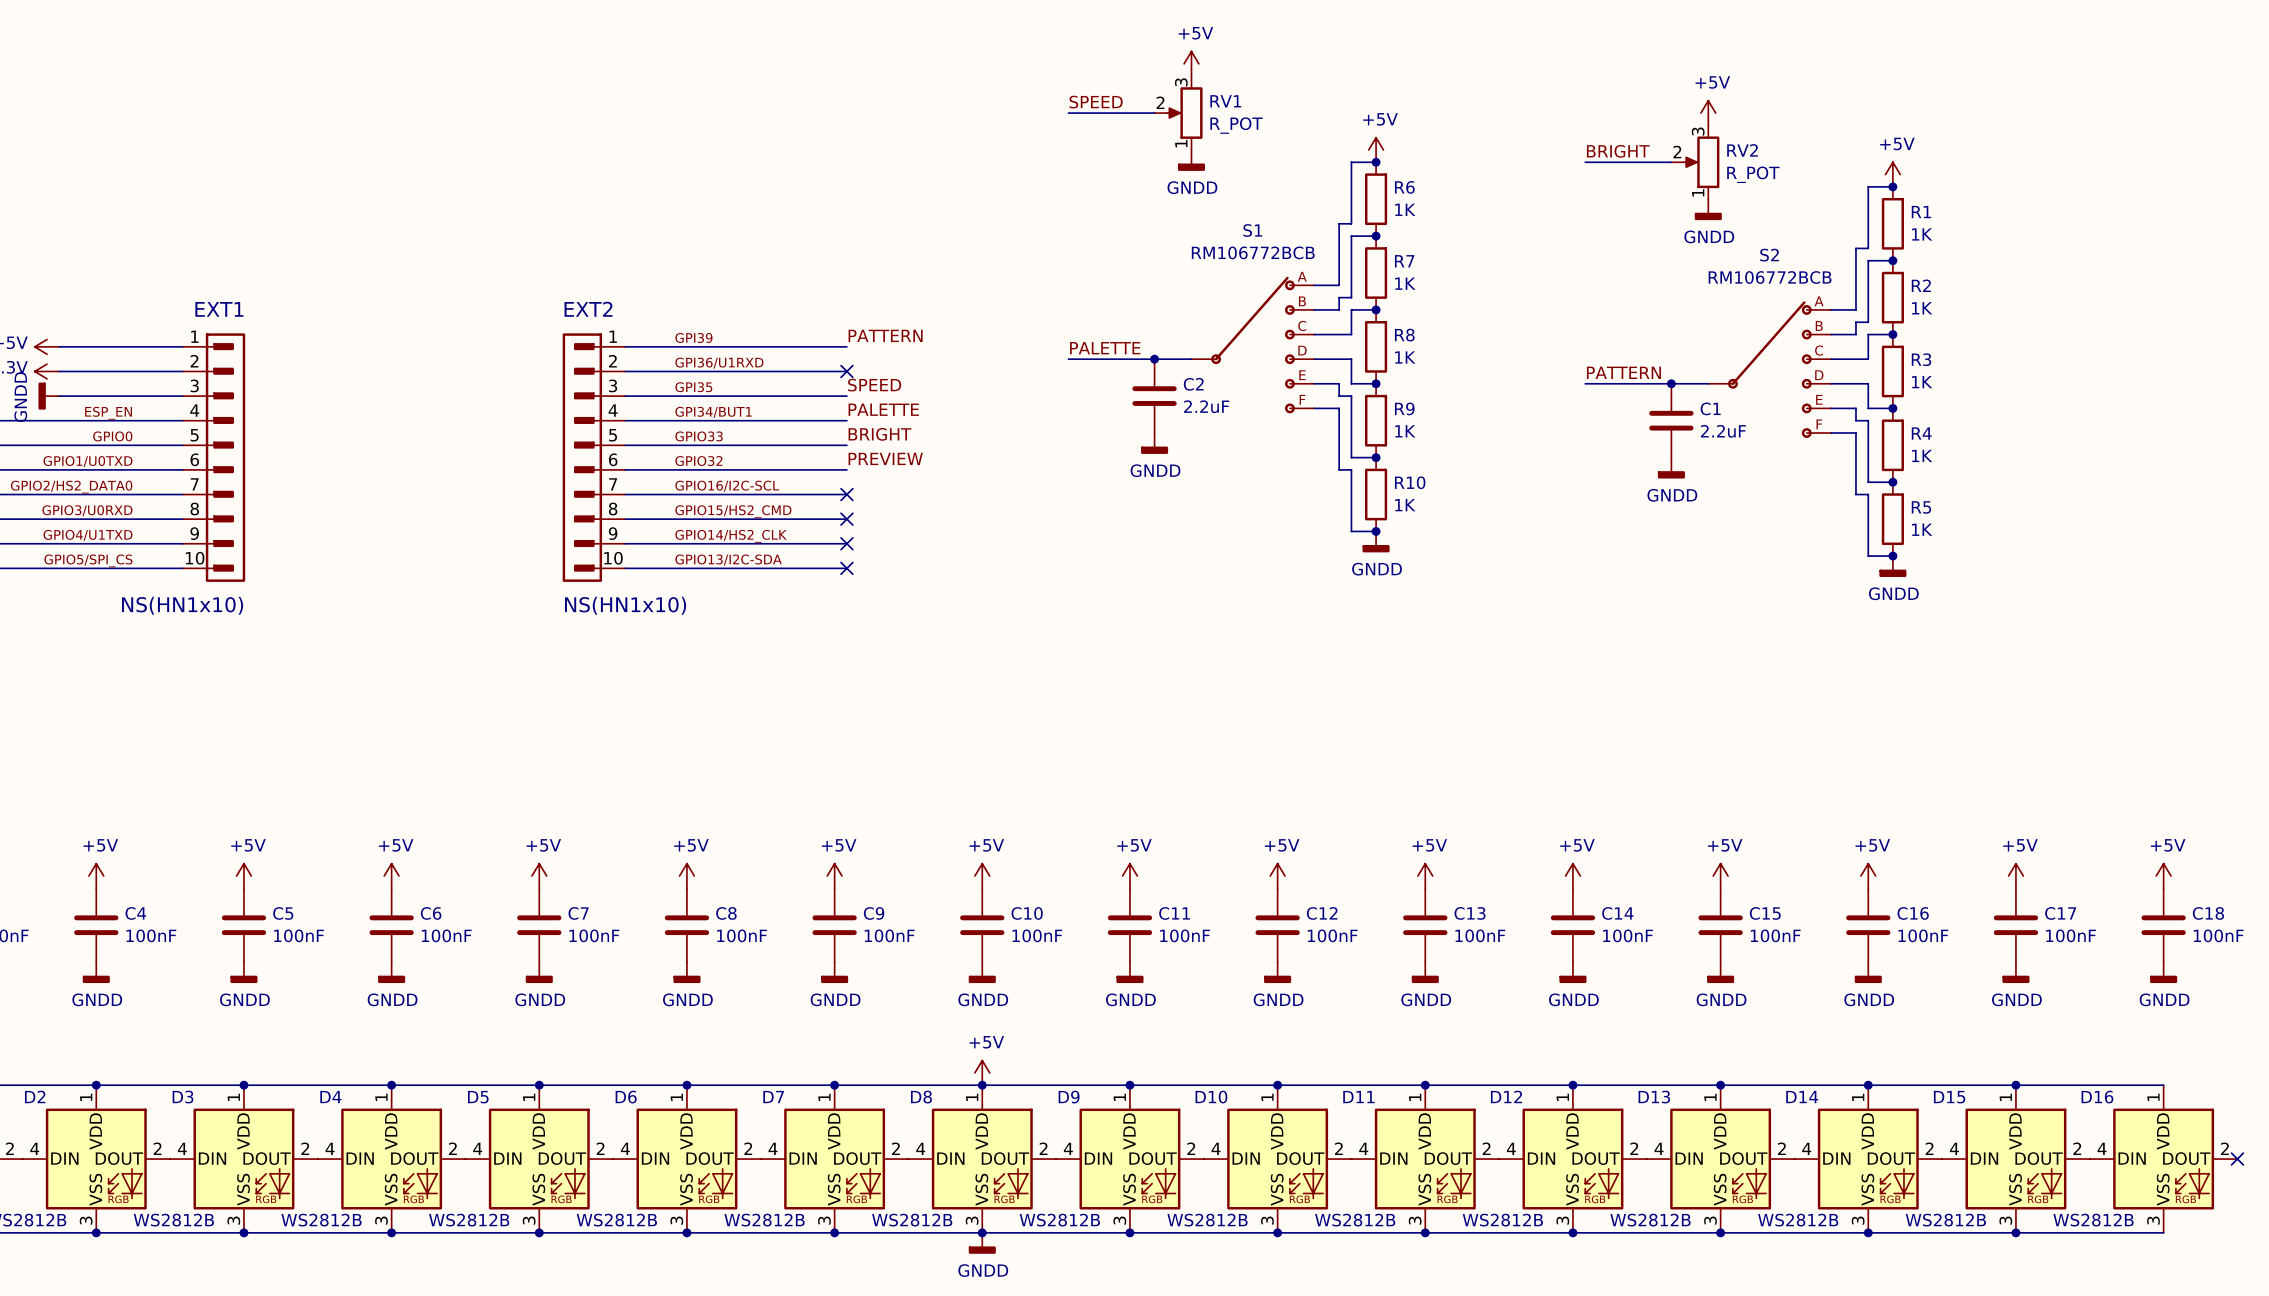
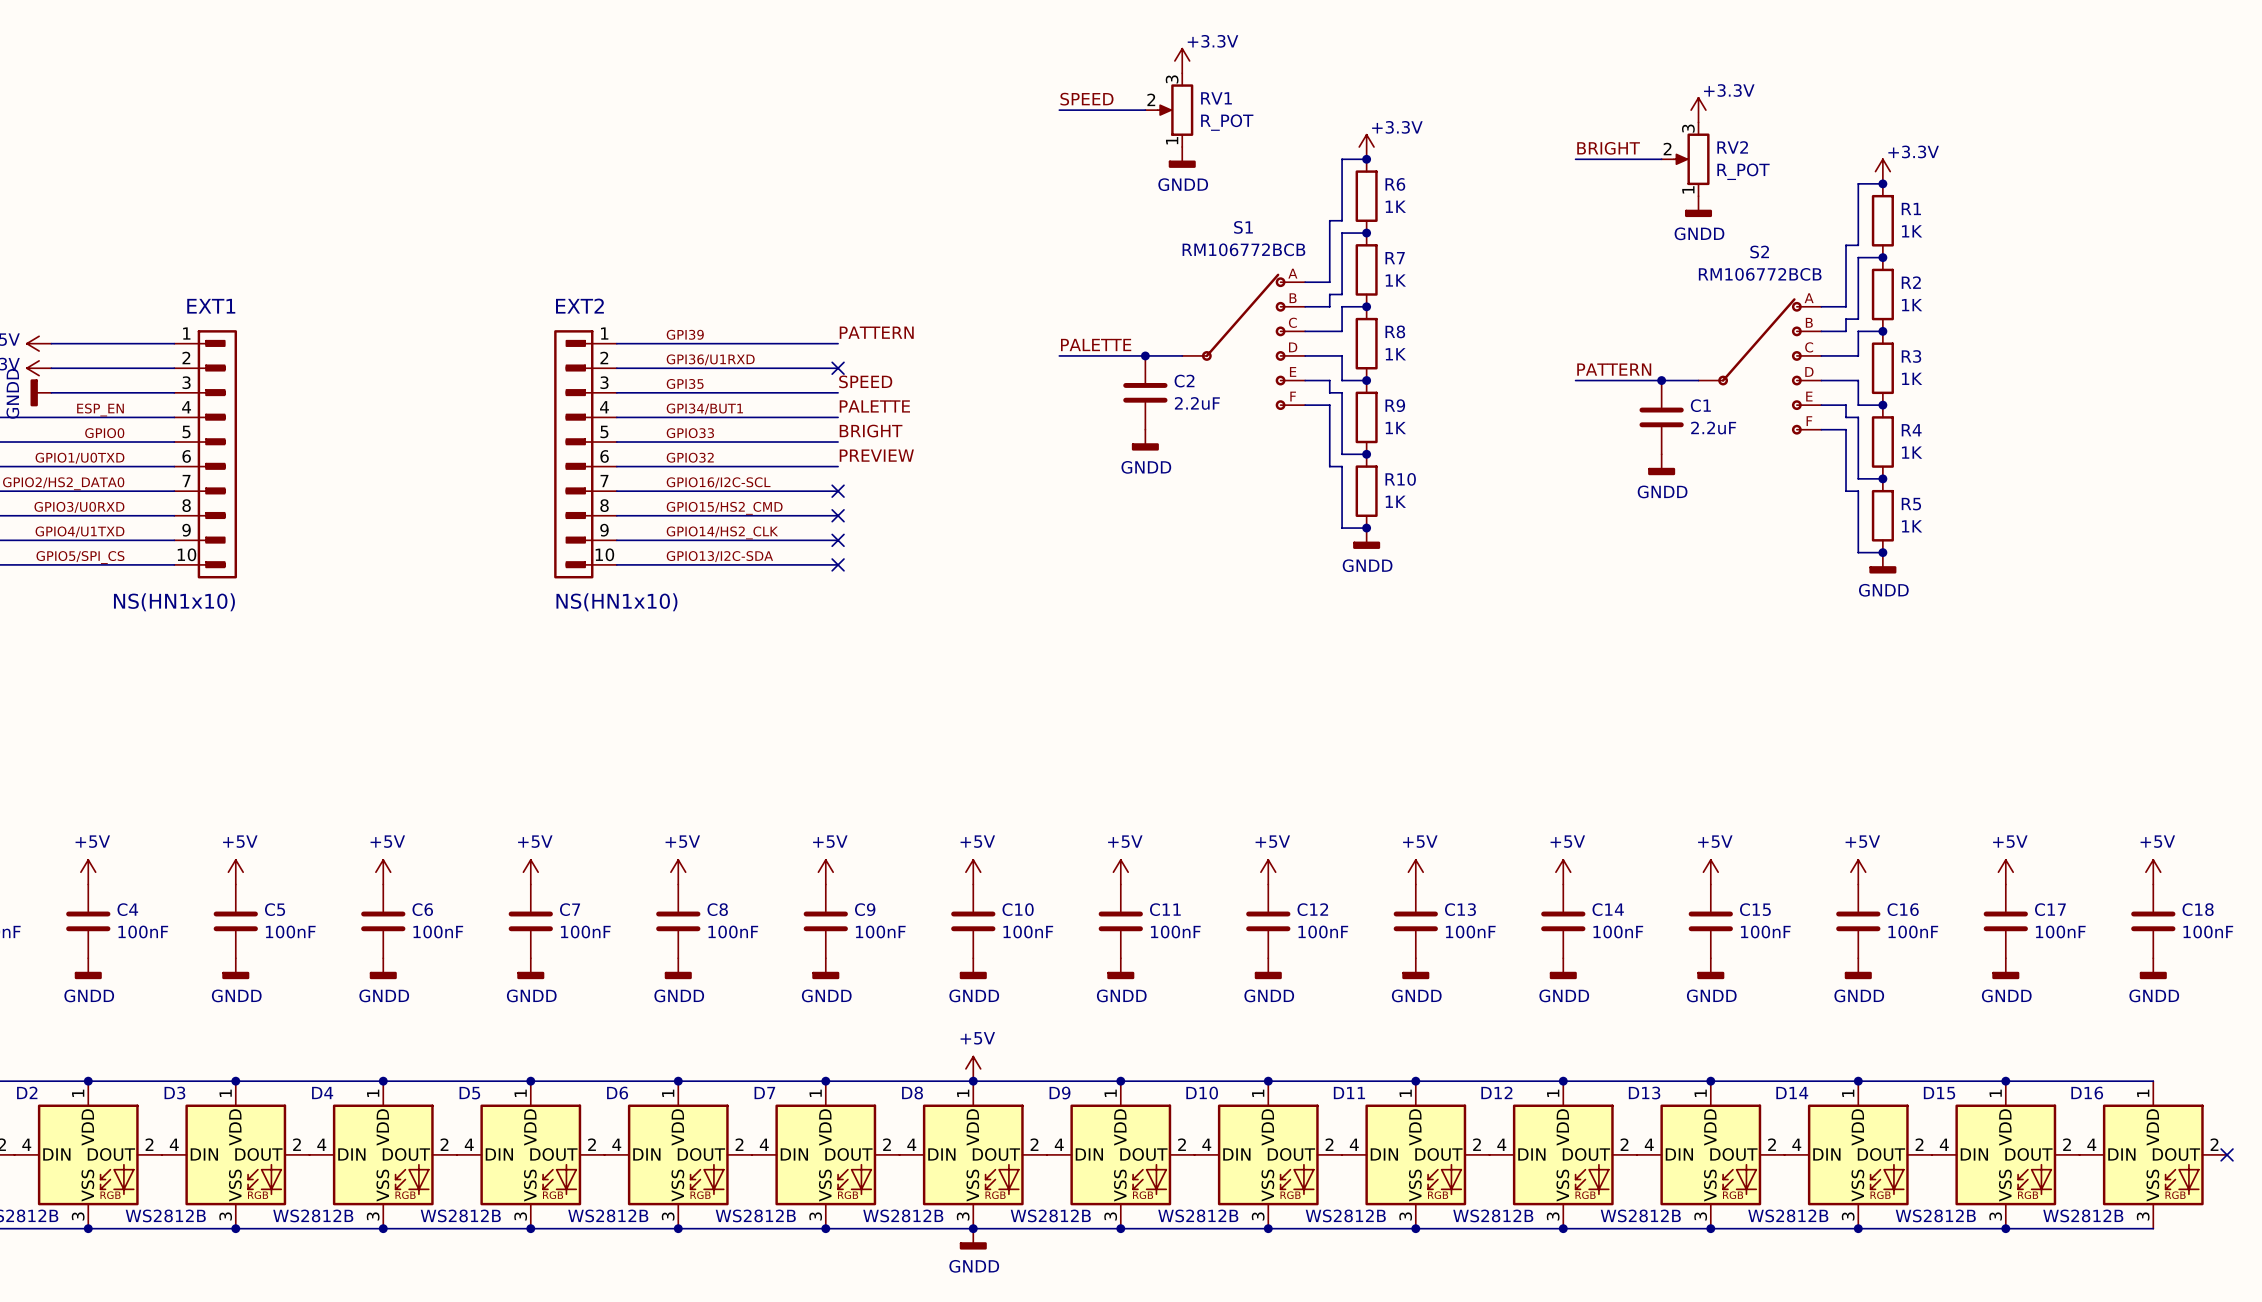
power symbol: +5V (1191, 63) -> +3.3V (1182, 60)
power symbol: +5V (1708, 113) -> +3.3V (1698, 110)
power symbol: +5V (1376, 149) -> +3.3V (1366, 147)
power symbol: +5V (1892, 174) -> +3.3V (1882, 171)

